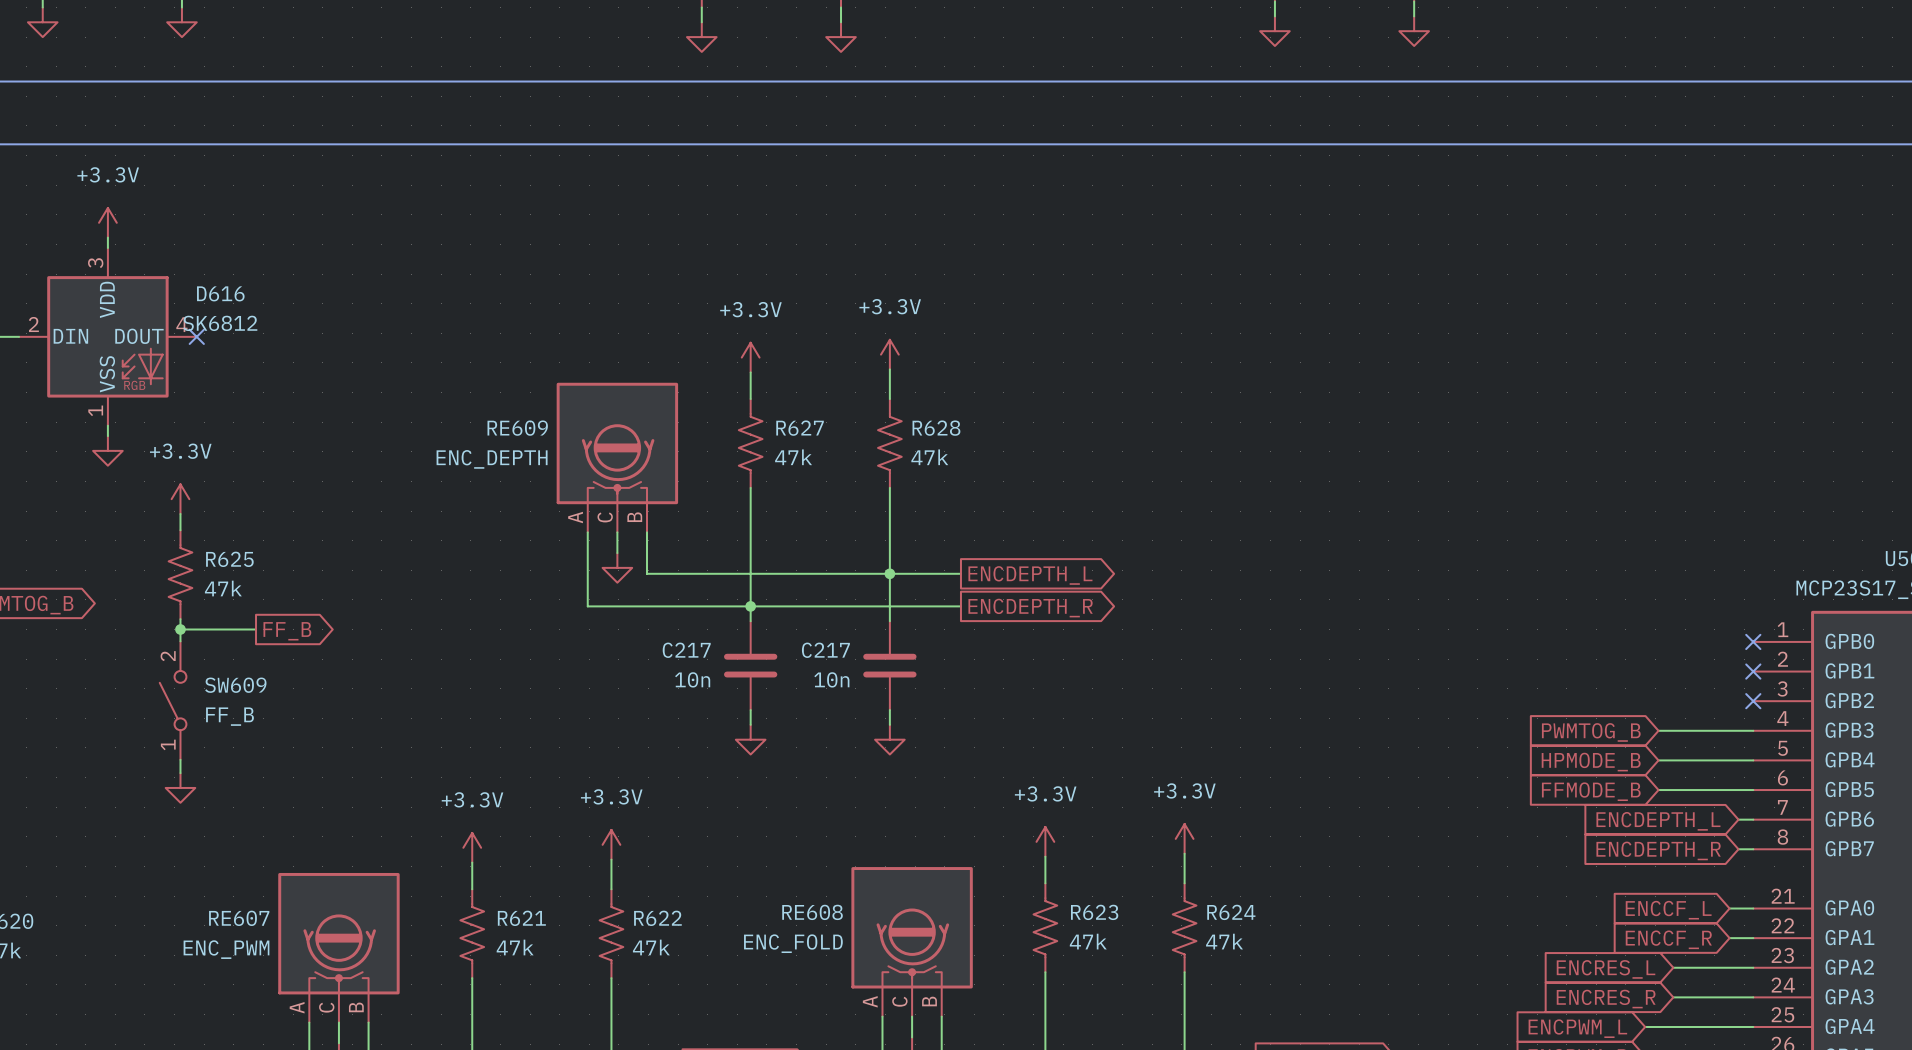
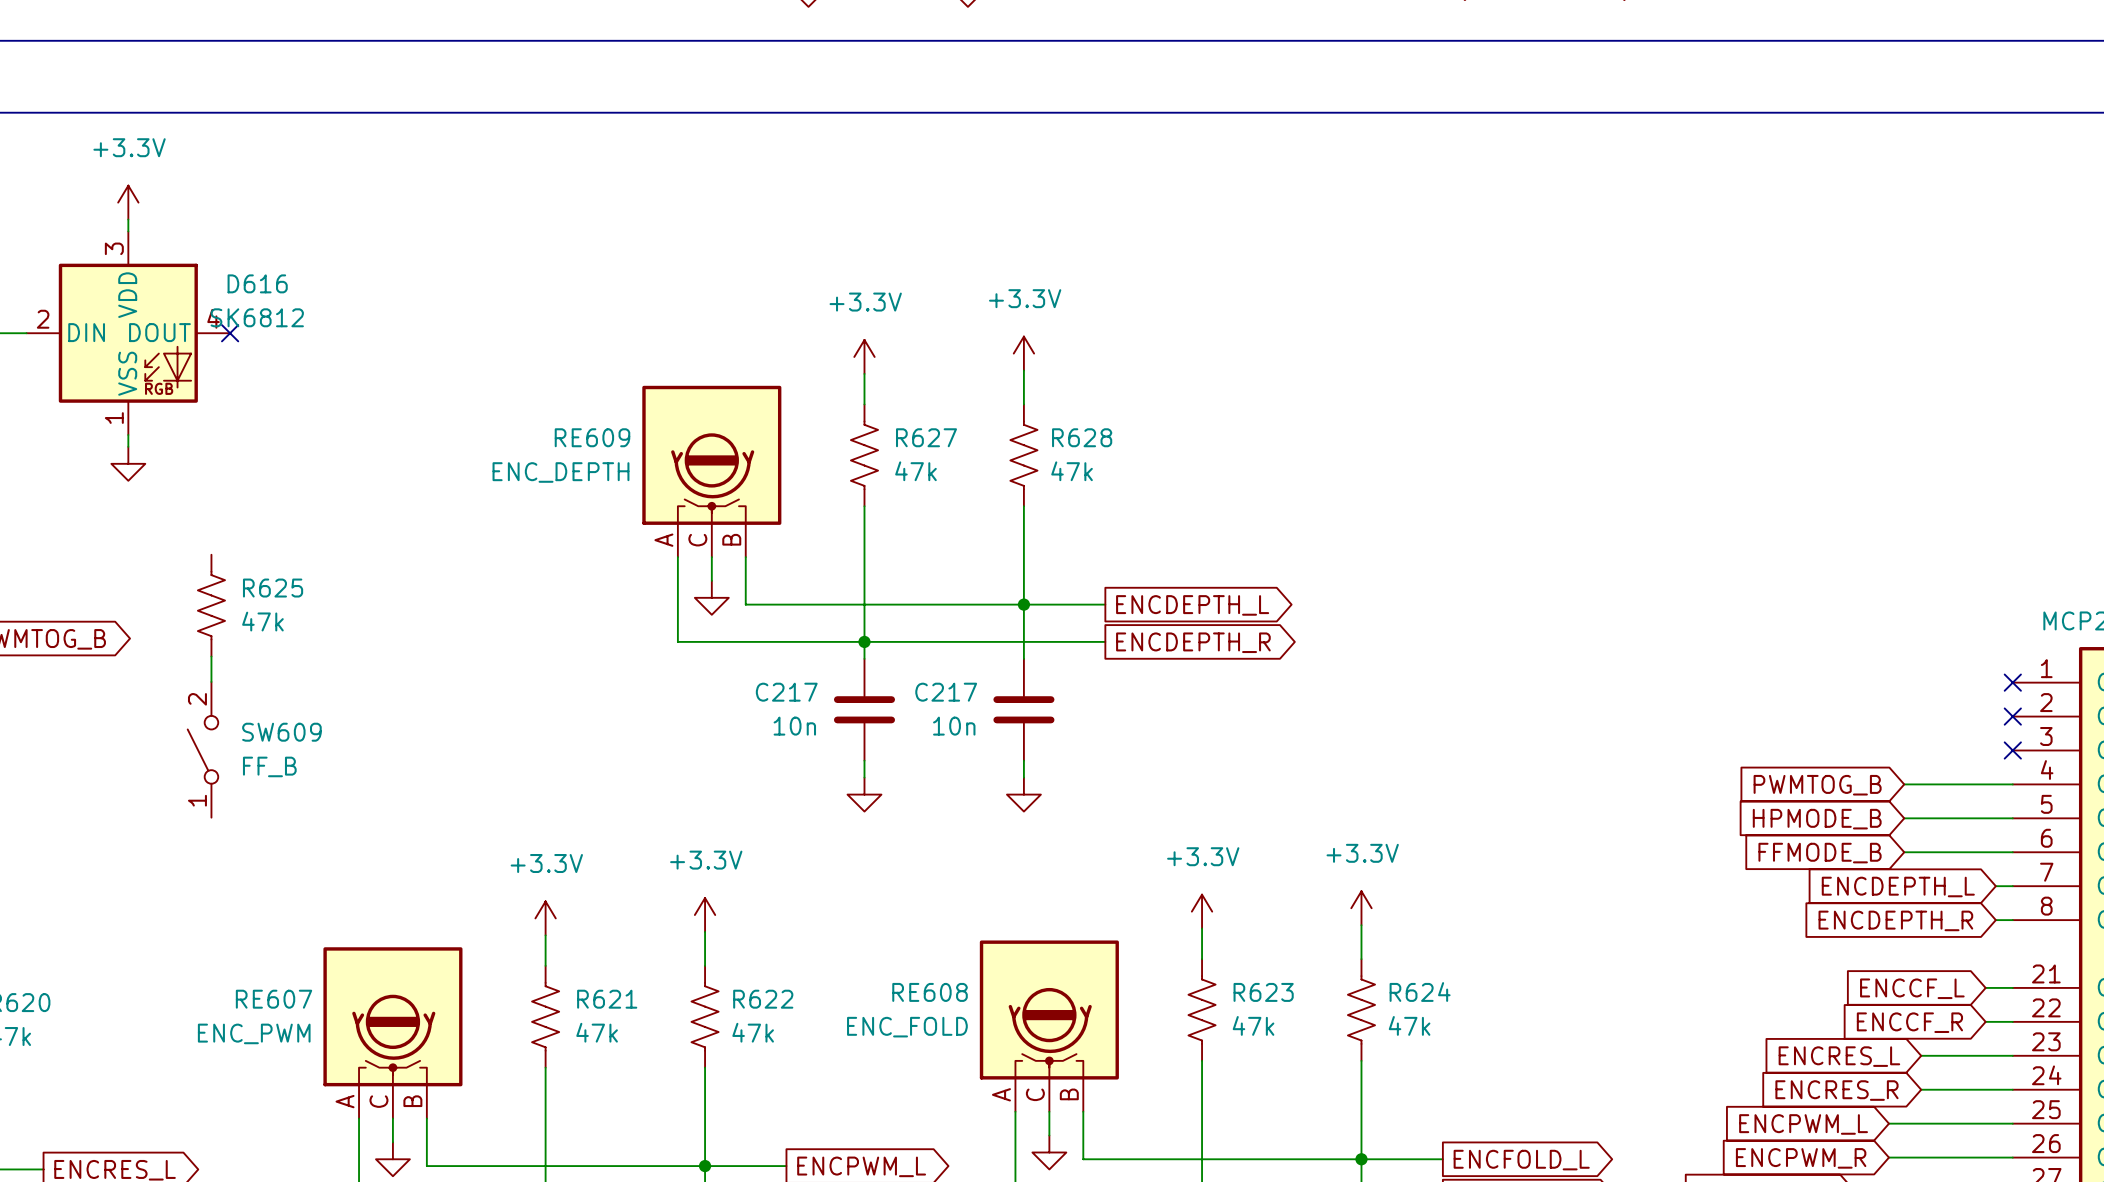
power symbol: +3.3V (180, 499) -> none
wire: (180, 513) (180, 530) -> none
wire: (180, 629) (256, 629) -> none
junction: (180, 629) -> none
global label: FF_B (287, 631) -> none
wire: (180, 759) (180, 773) -> none
power symbol: (180, 787) -> none

